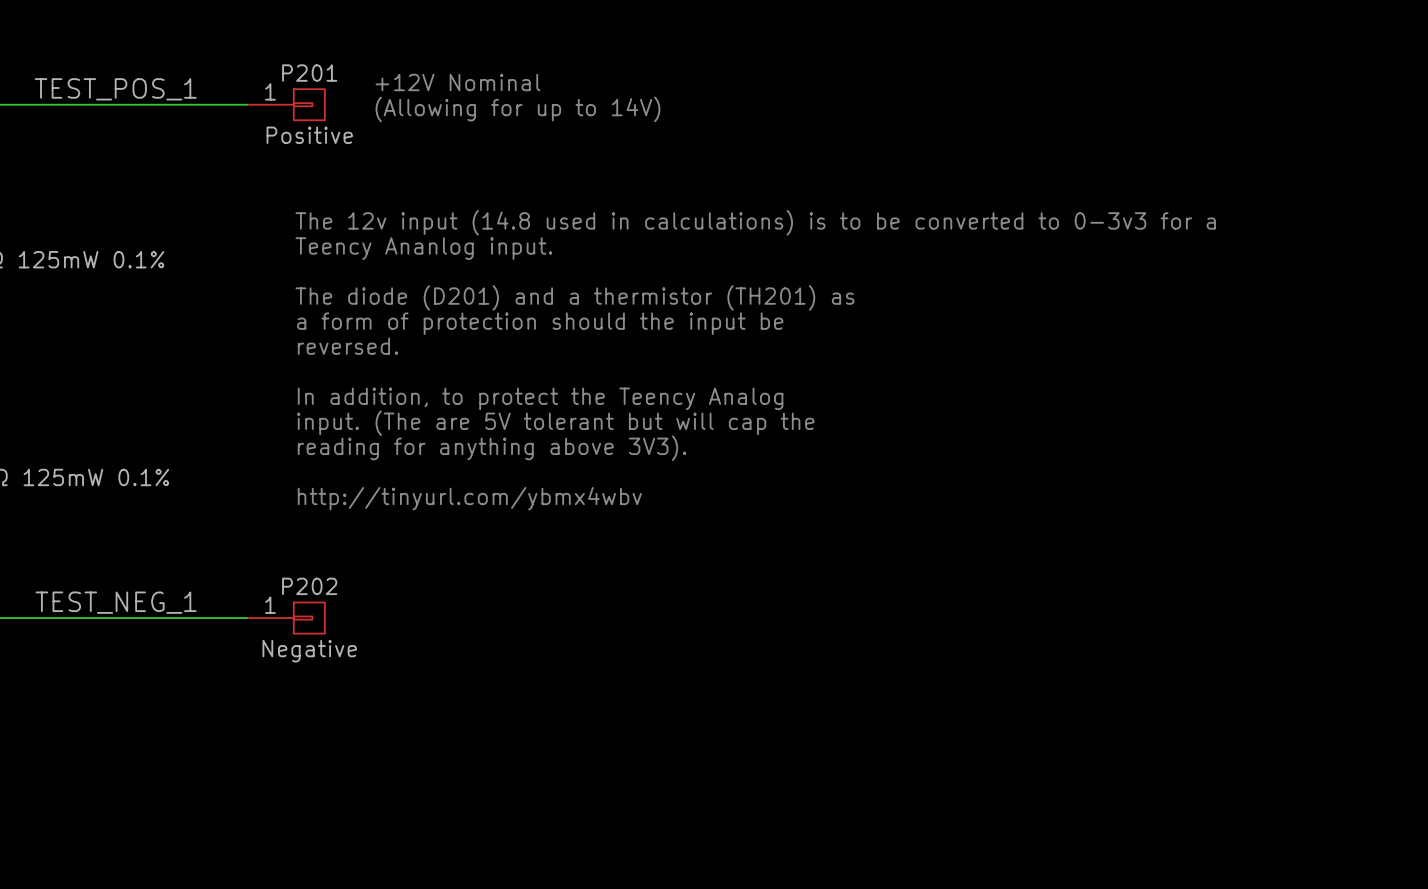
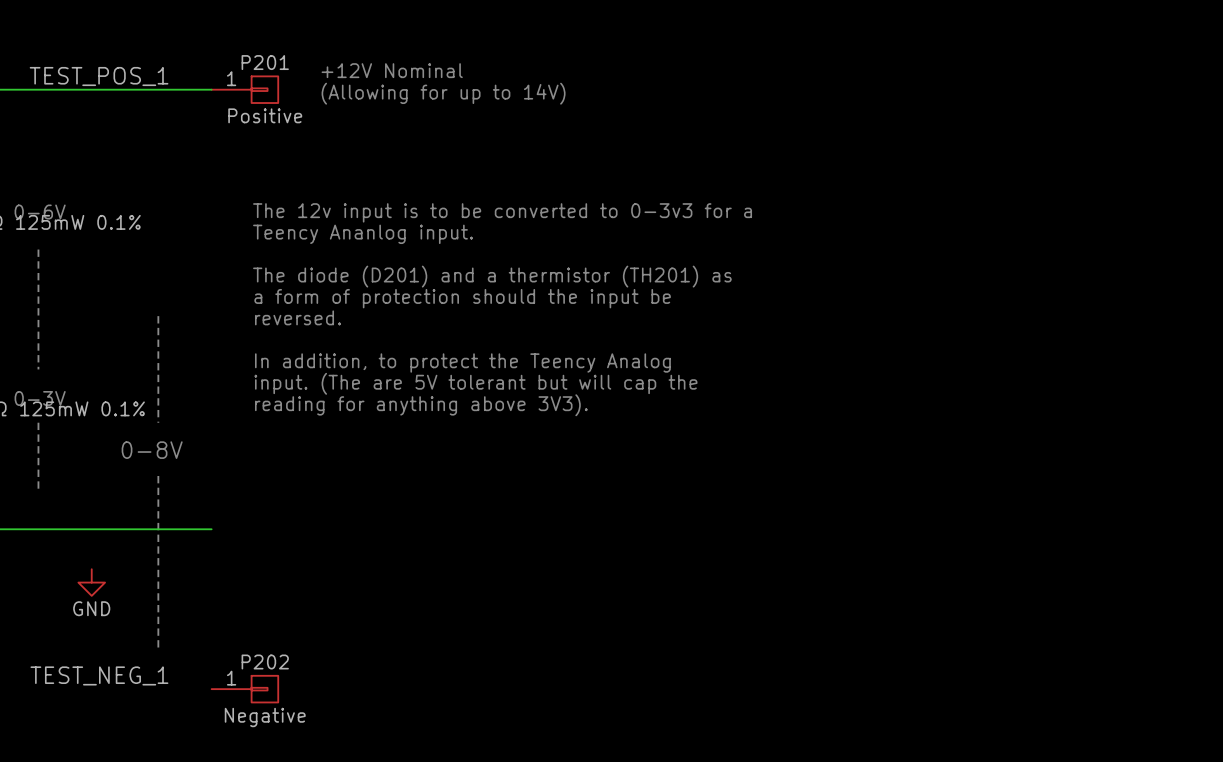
text: The 12v input (14.8 used in calculations) is to be converted to 0-3v3 for a (755, 222) -> none
text: none -> 0-6V (40, 211)
text: Teency Ananlog input. (423, 248) -> The 12v input is to be converted to 0-3v3 for a (502, 212)
text: none -> Teency Ananlog input. (363, 234)
line: none -> (38, 249) (38, 369)
text: The diode (D201) and a thermistor (TH201) as (575, 297) -> none
text: a form of protection should the input be (540, 323) -> The diode (D201) and a thermistor (TH201) as (492, 276)
text: reversed. (347, 346) -> a form of protection should the input be (462, 298)
line: none -> (158, 316) (158, 422)
text: none -> reversed. (297, 317)
text: In addition, to protect the Teency Analog (540, 398) -> none
text: input. (The are 5V tolerant but will cap the (555, 423) -> In addition, to protect the Teency Analog (462, 363)
text: reading for anything above 3V3). (492, 448) -> input. (The are 5V tolerant but will cap the (475, 383)
text: none -> 0-3V (40, 398)
text: none -> reading for anything above 3V3). (421, 405)
line: none -> (38, 422) (38, 489)
text: http://tinyurl.com/ybmx4wbv (469, 498) -> none
text: none -> 0-8V (152, 450)
line: none -> (158, 476) (158, 649)
label position: TEST_NEG_1 (116, 602) -> TEST_NEG_1 (99, 675)
P202 position: (286, 618) -> (244, 689)
power symbol: none -> GND (91, 582)

